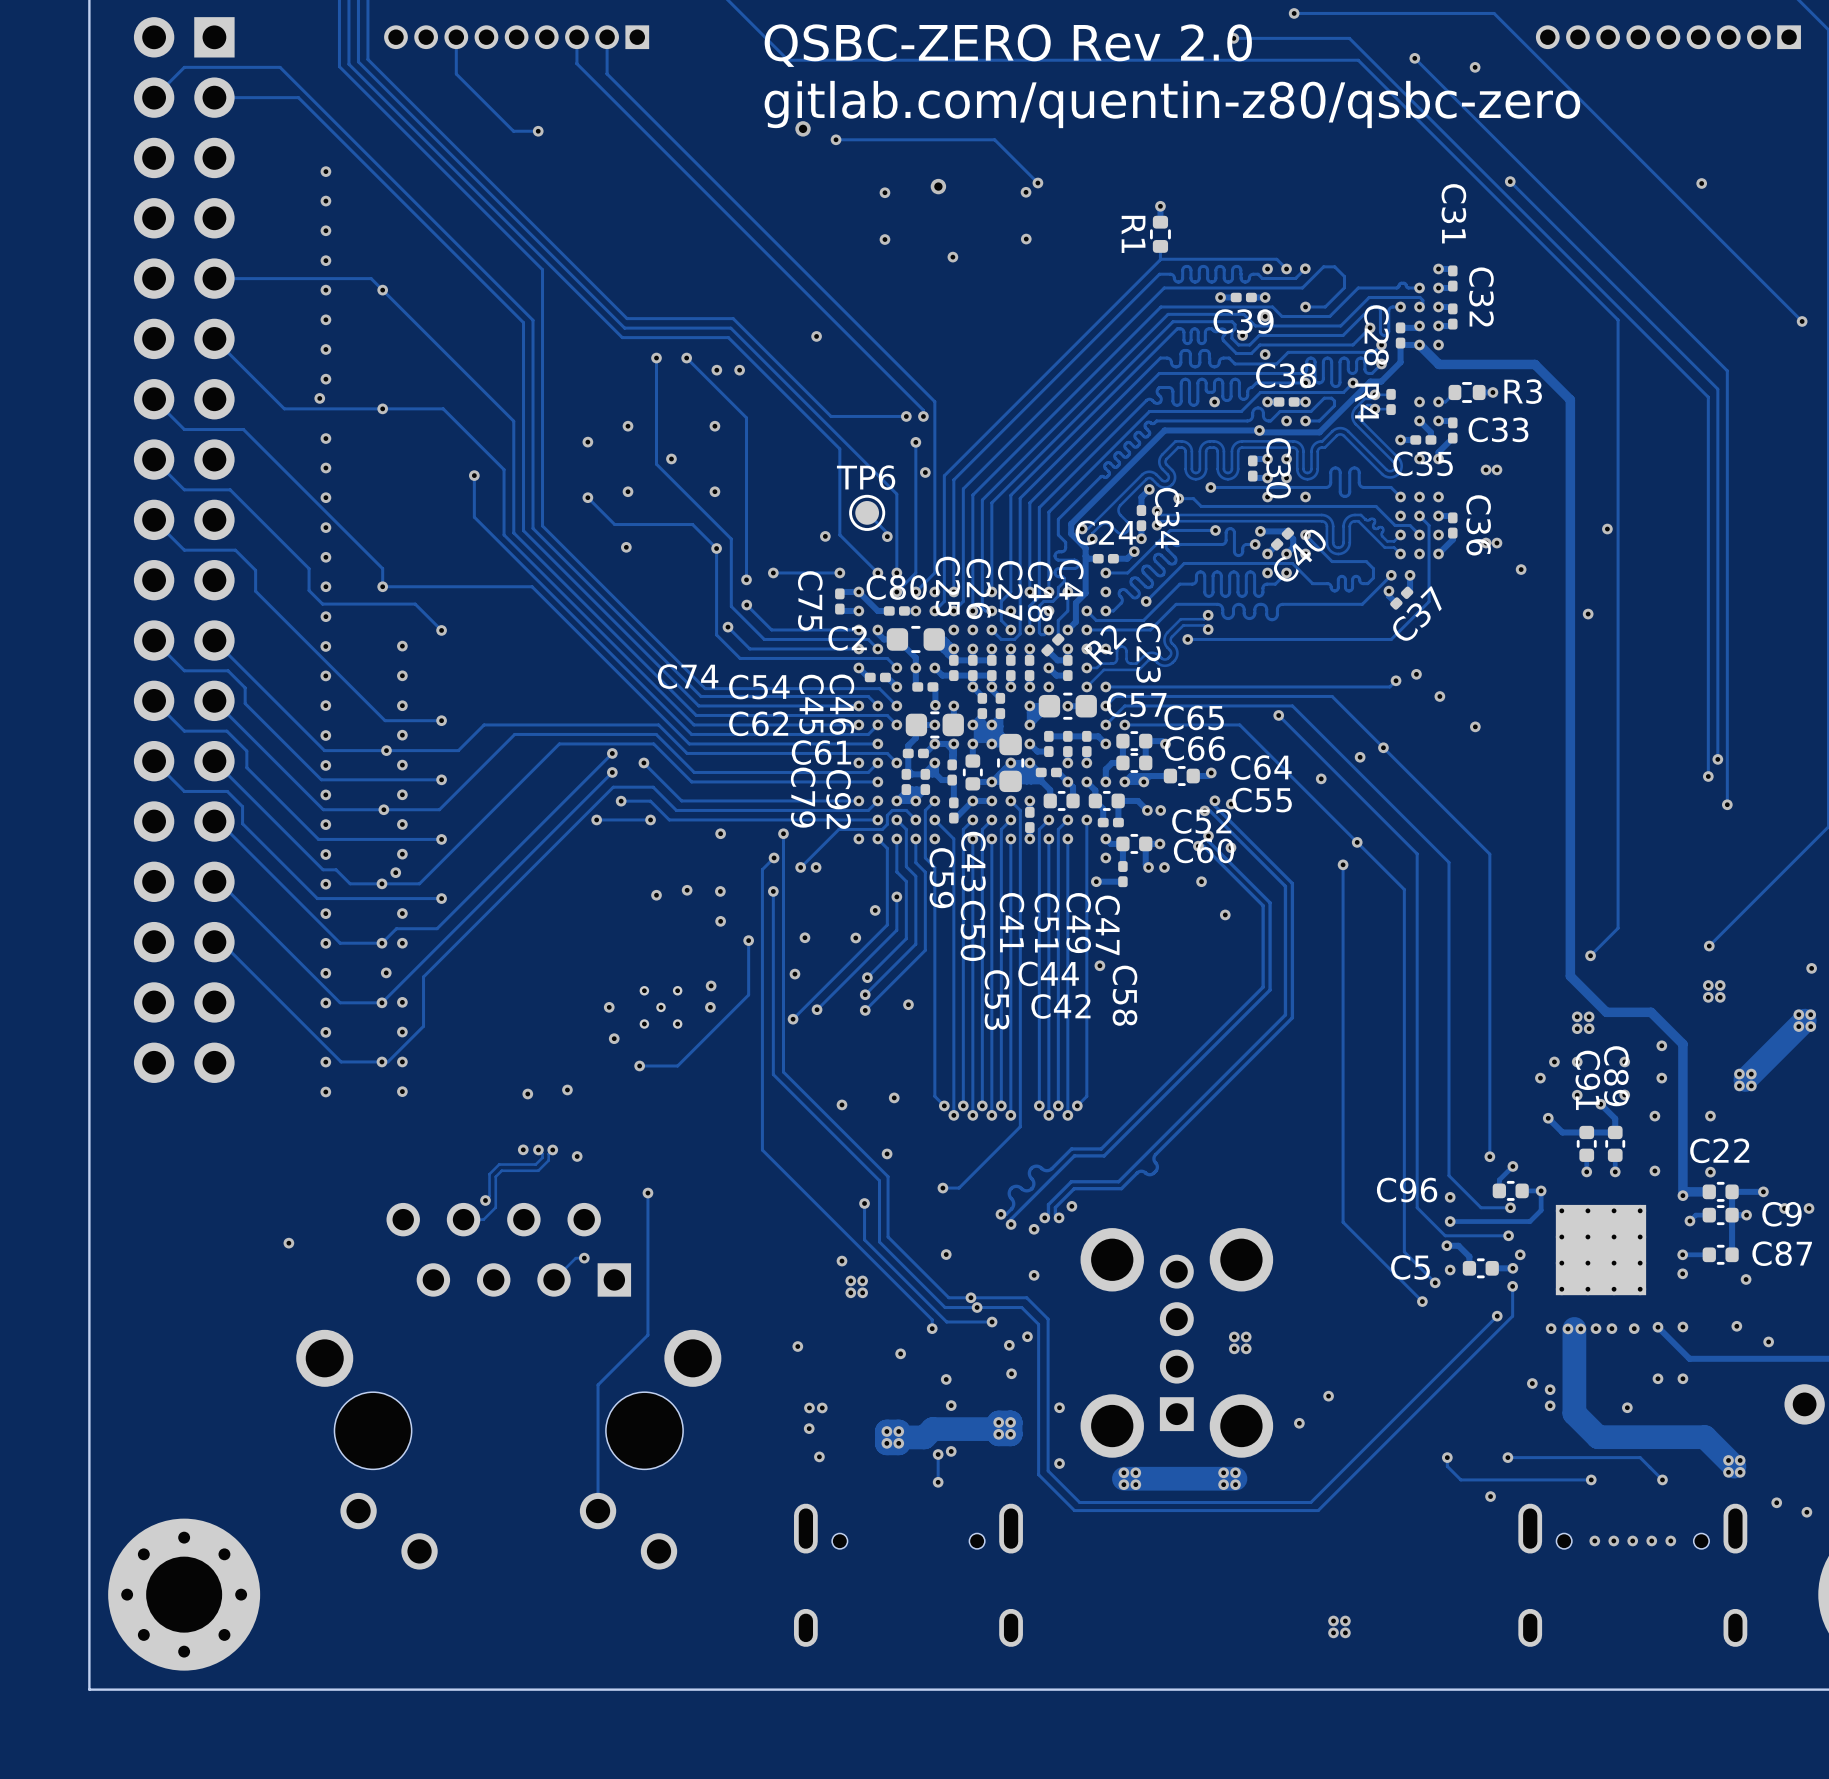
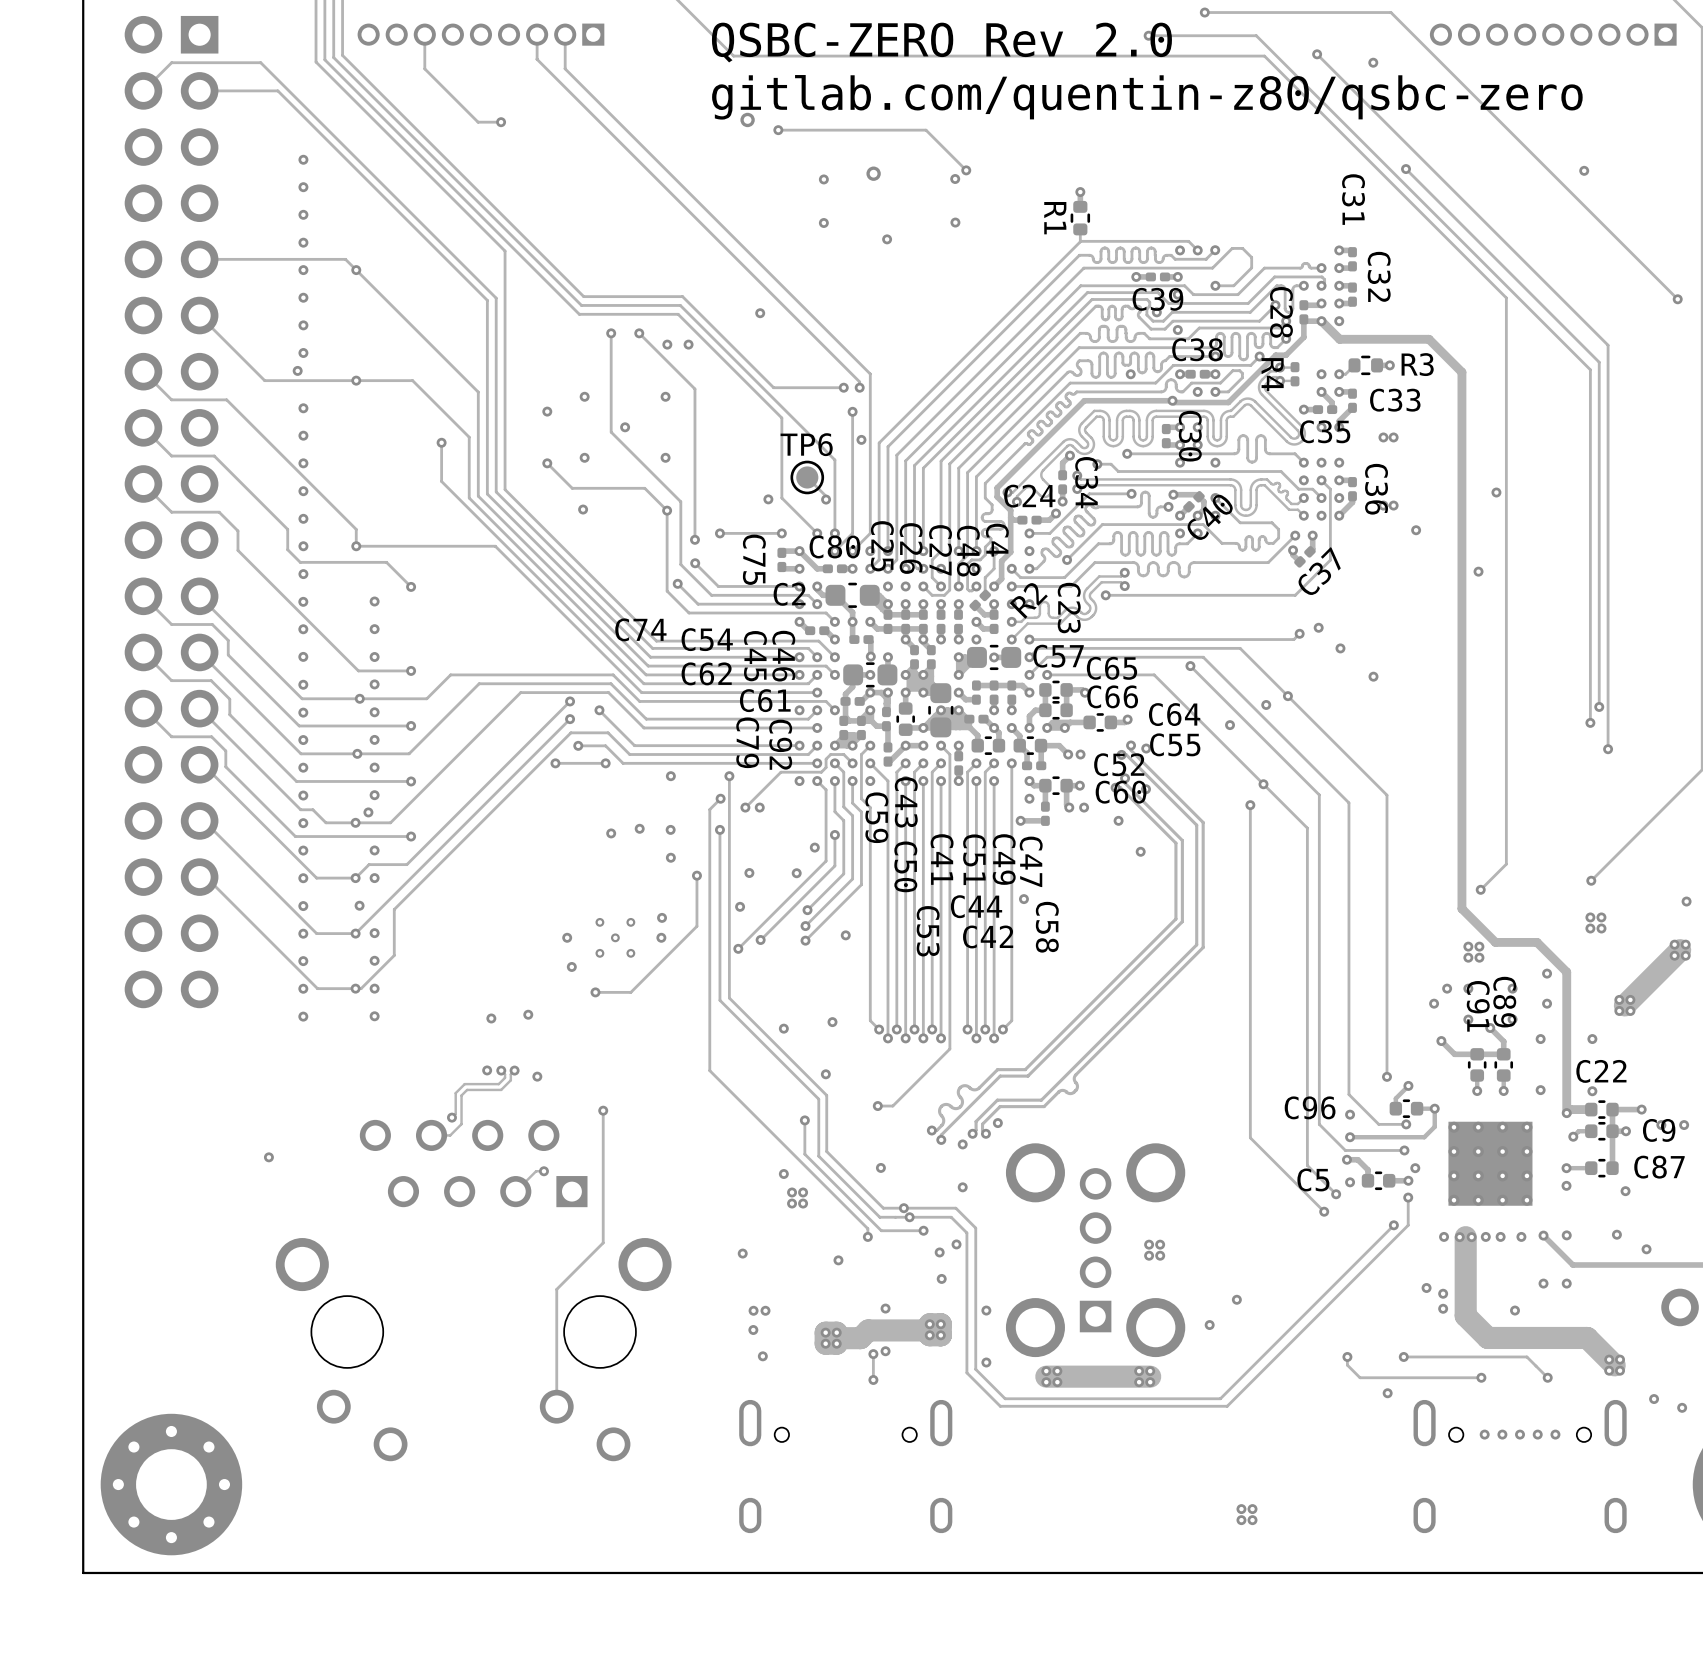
via: (946, 1379) -> none

